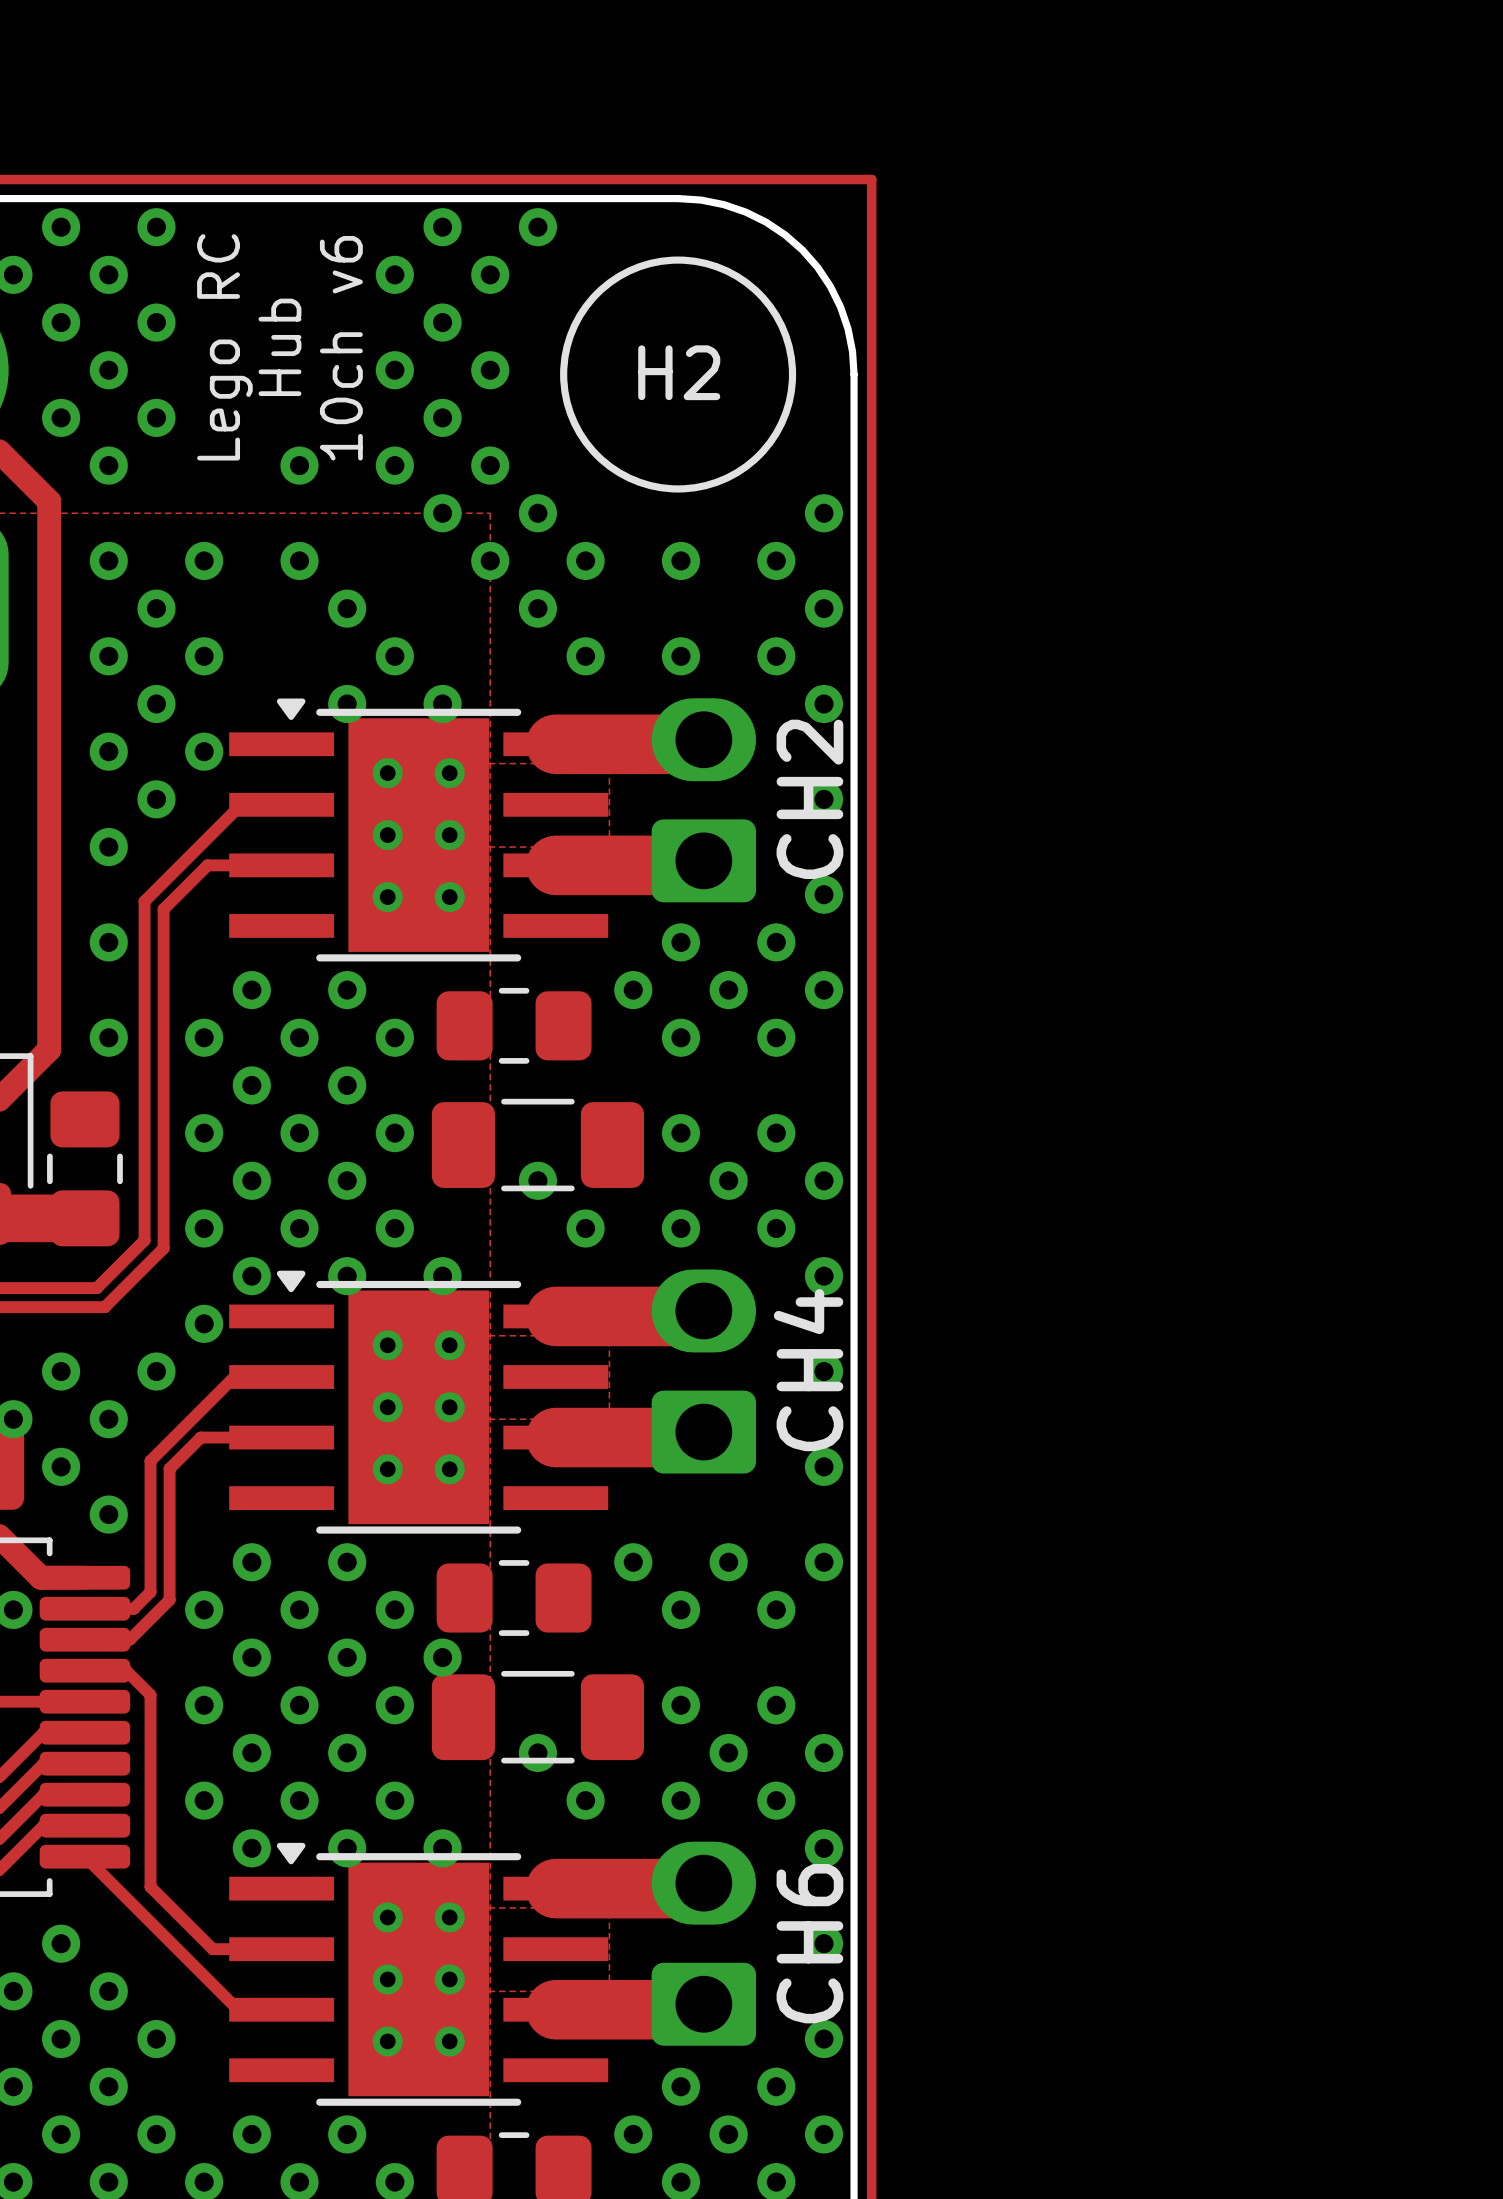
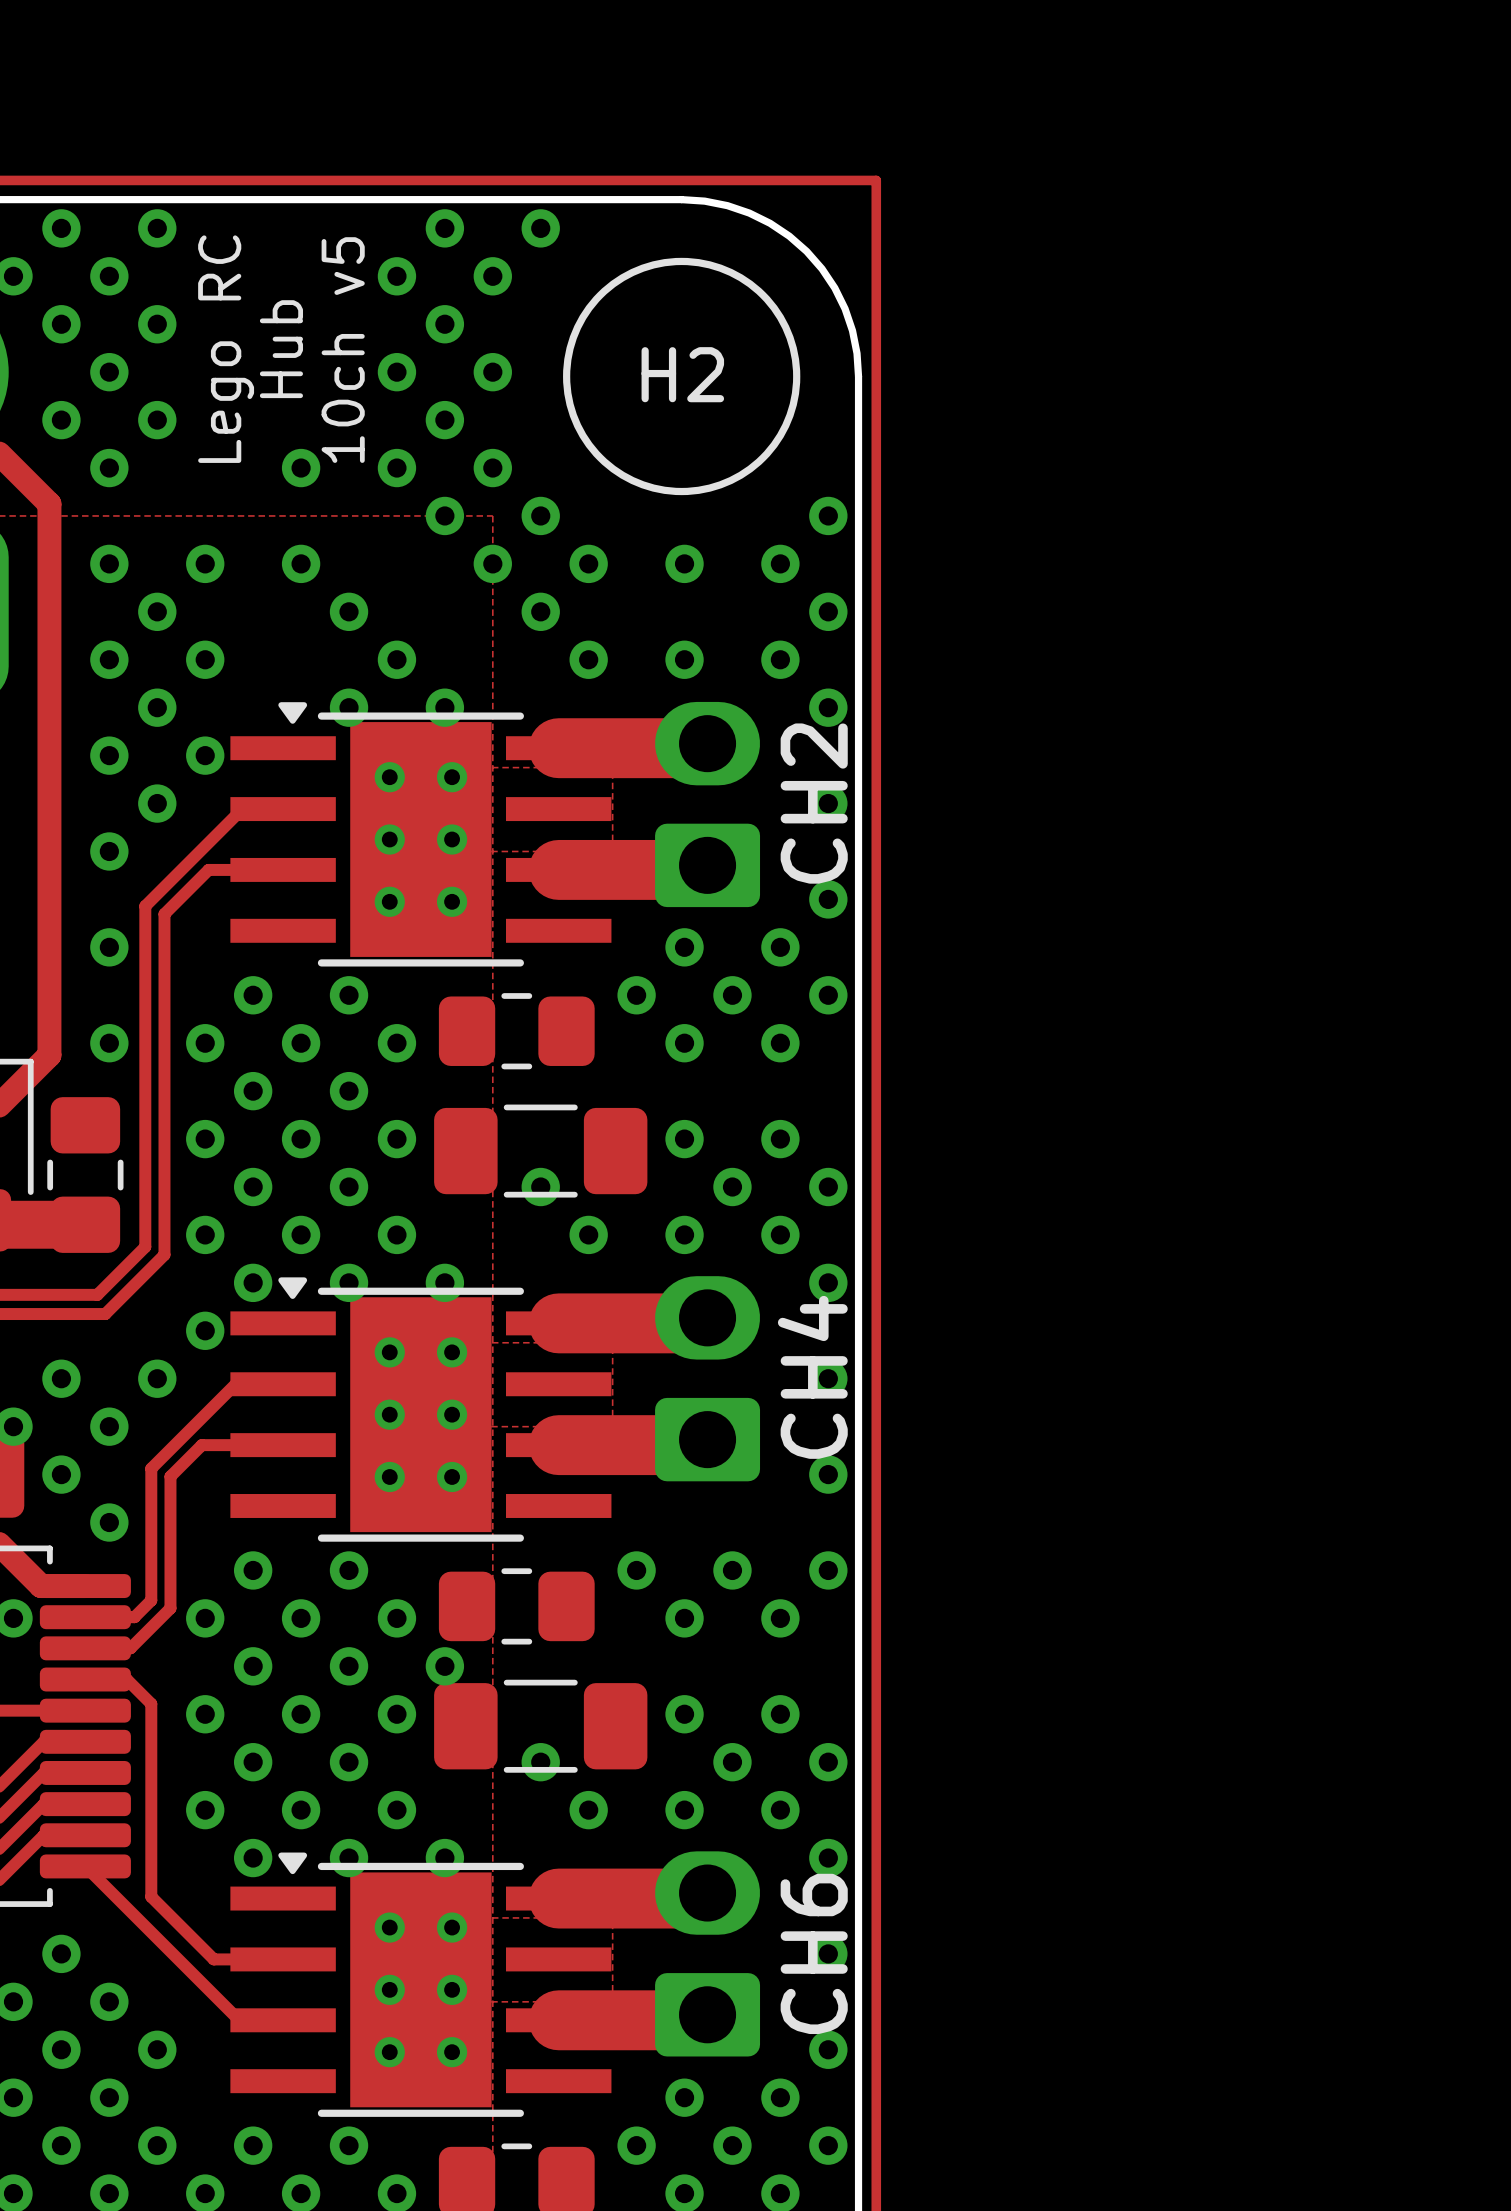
text: 10ch v6 (341, 348) -> 10ch v5 (343, 350)

